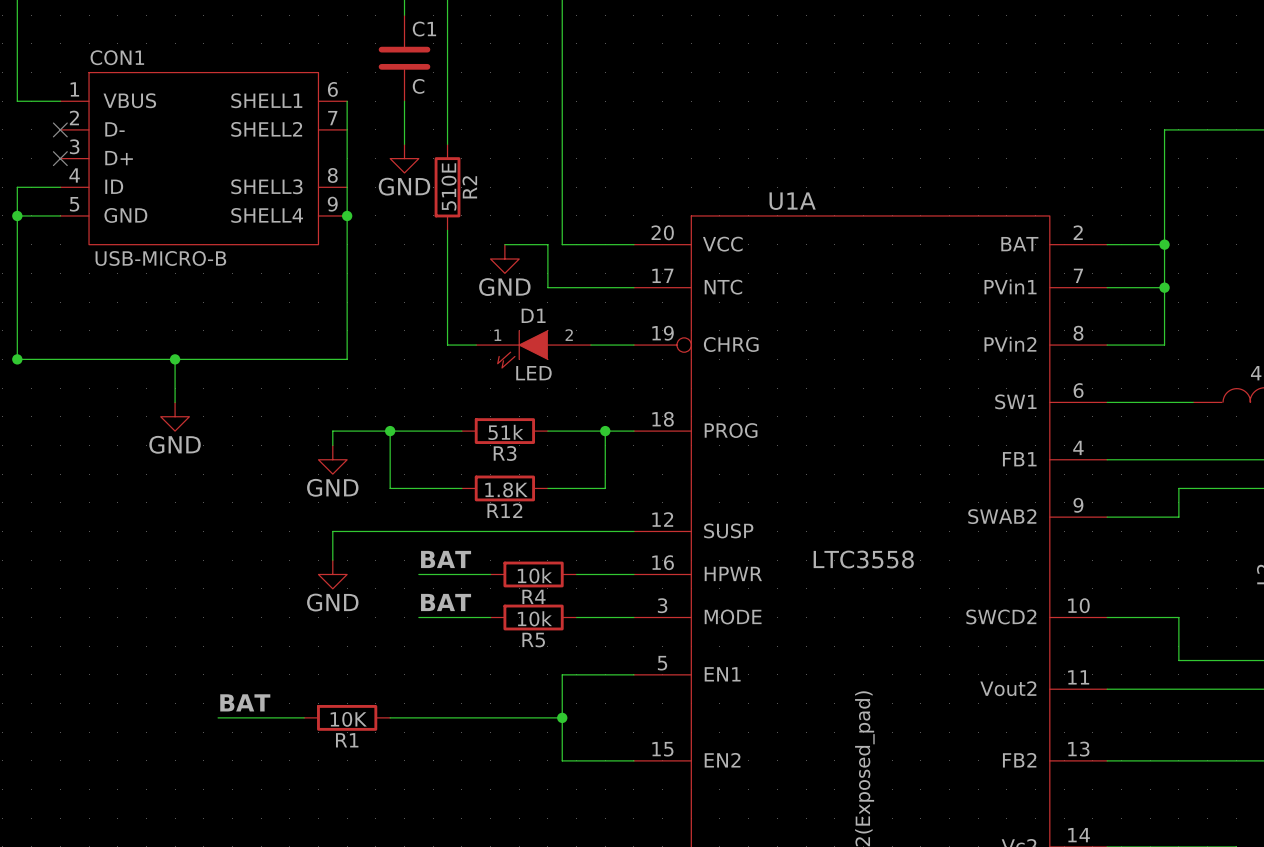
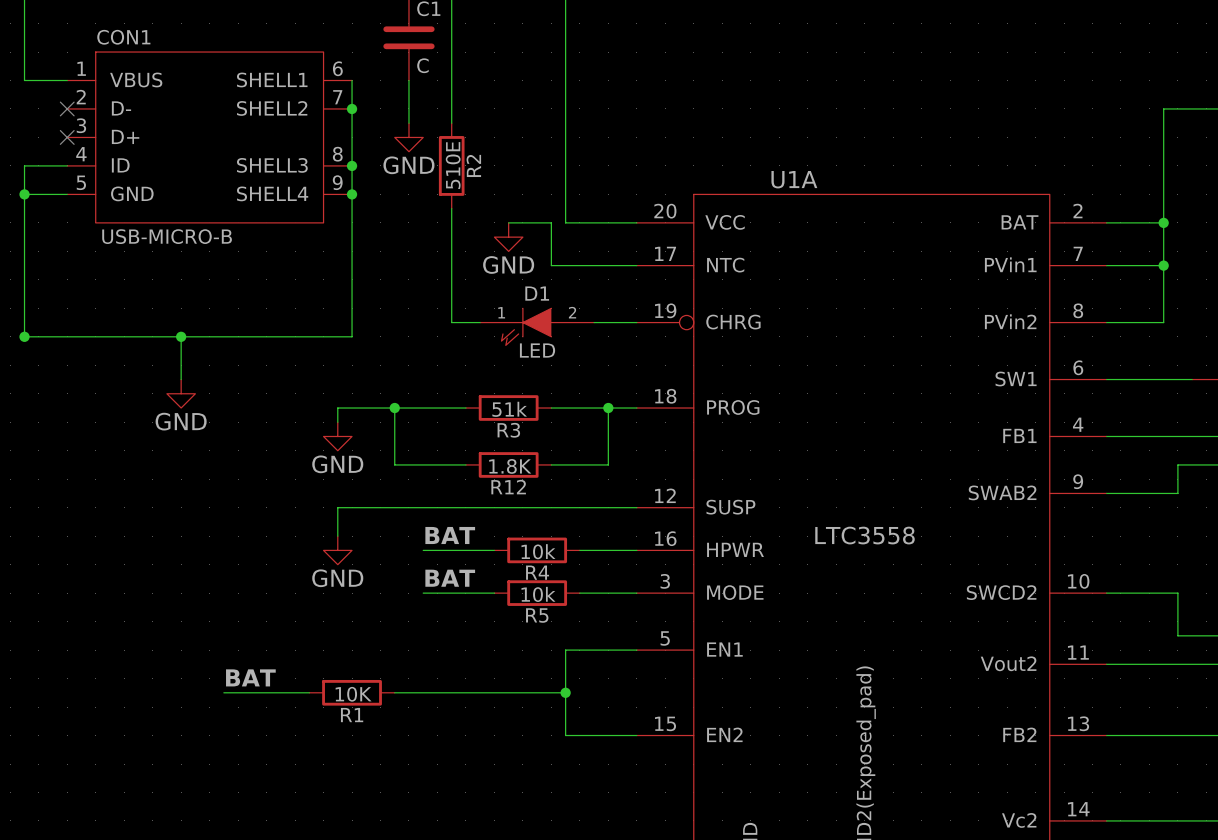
junction: none -> (352, 108)
junction: none -> (352, 165)

